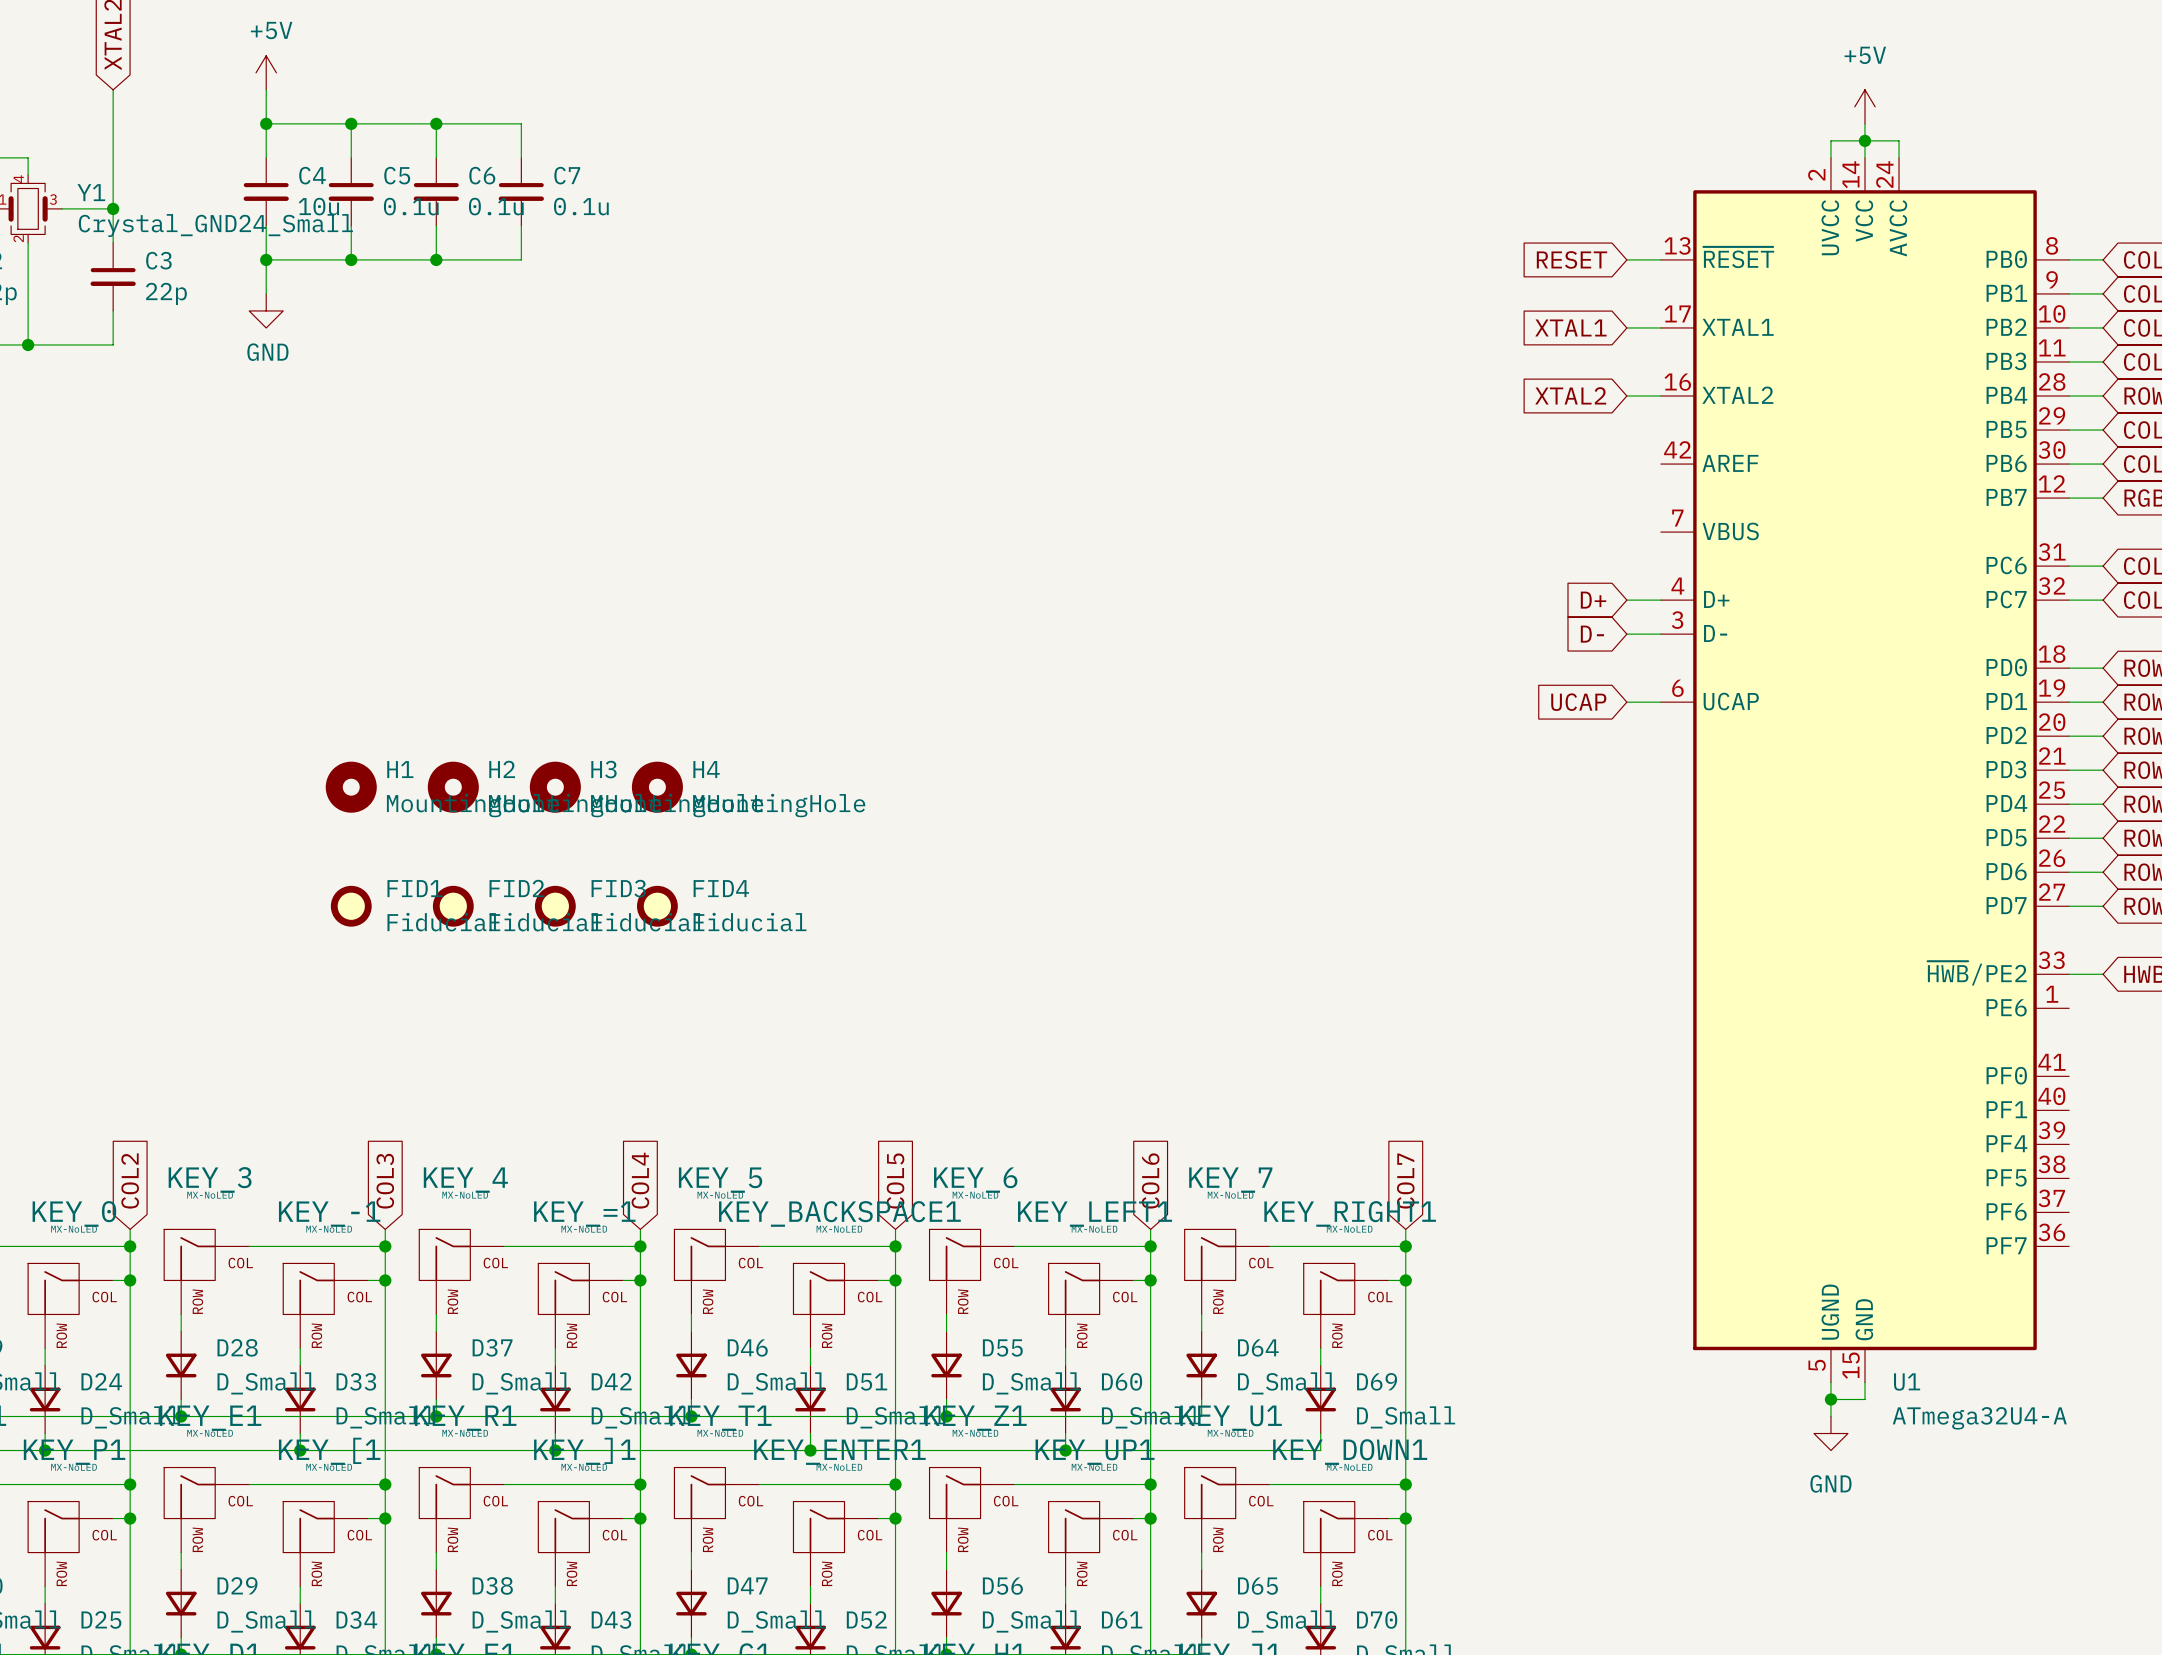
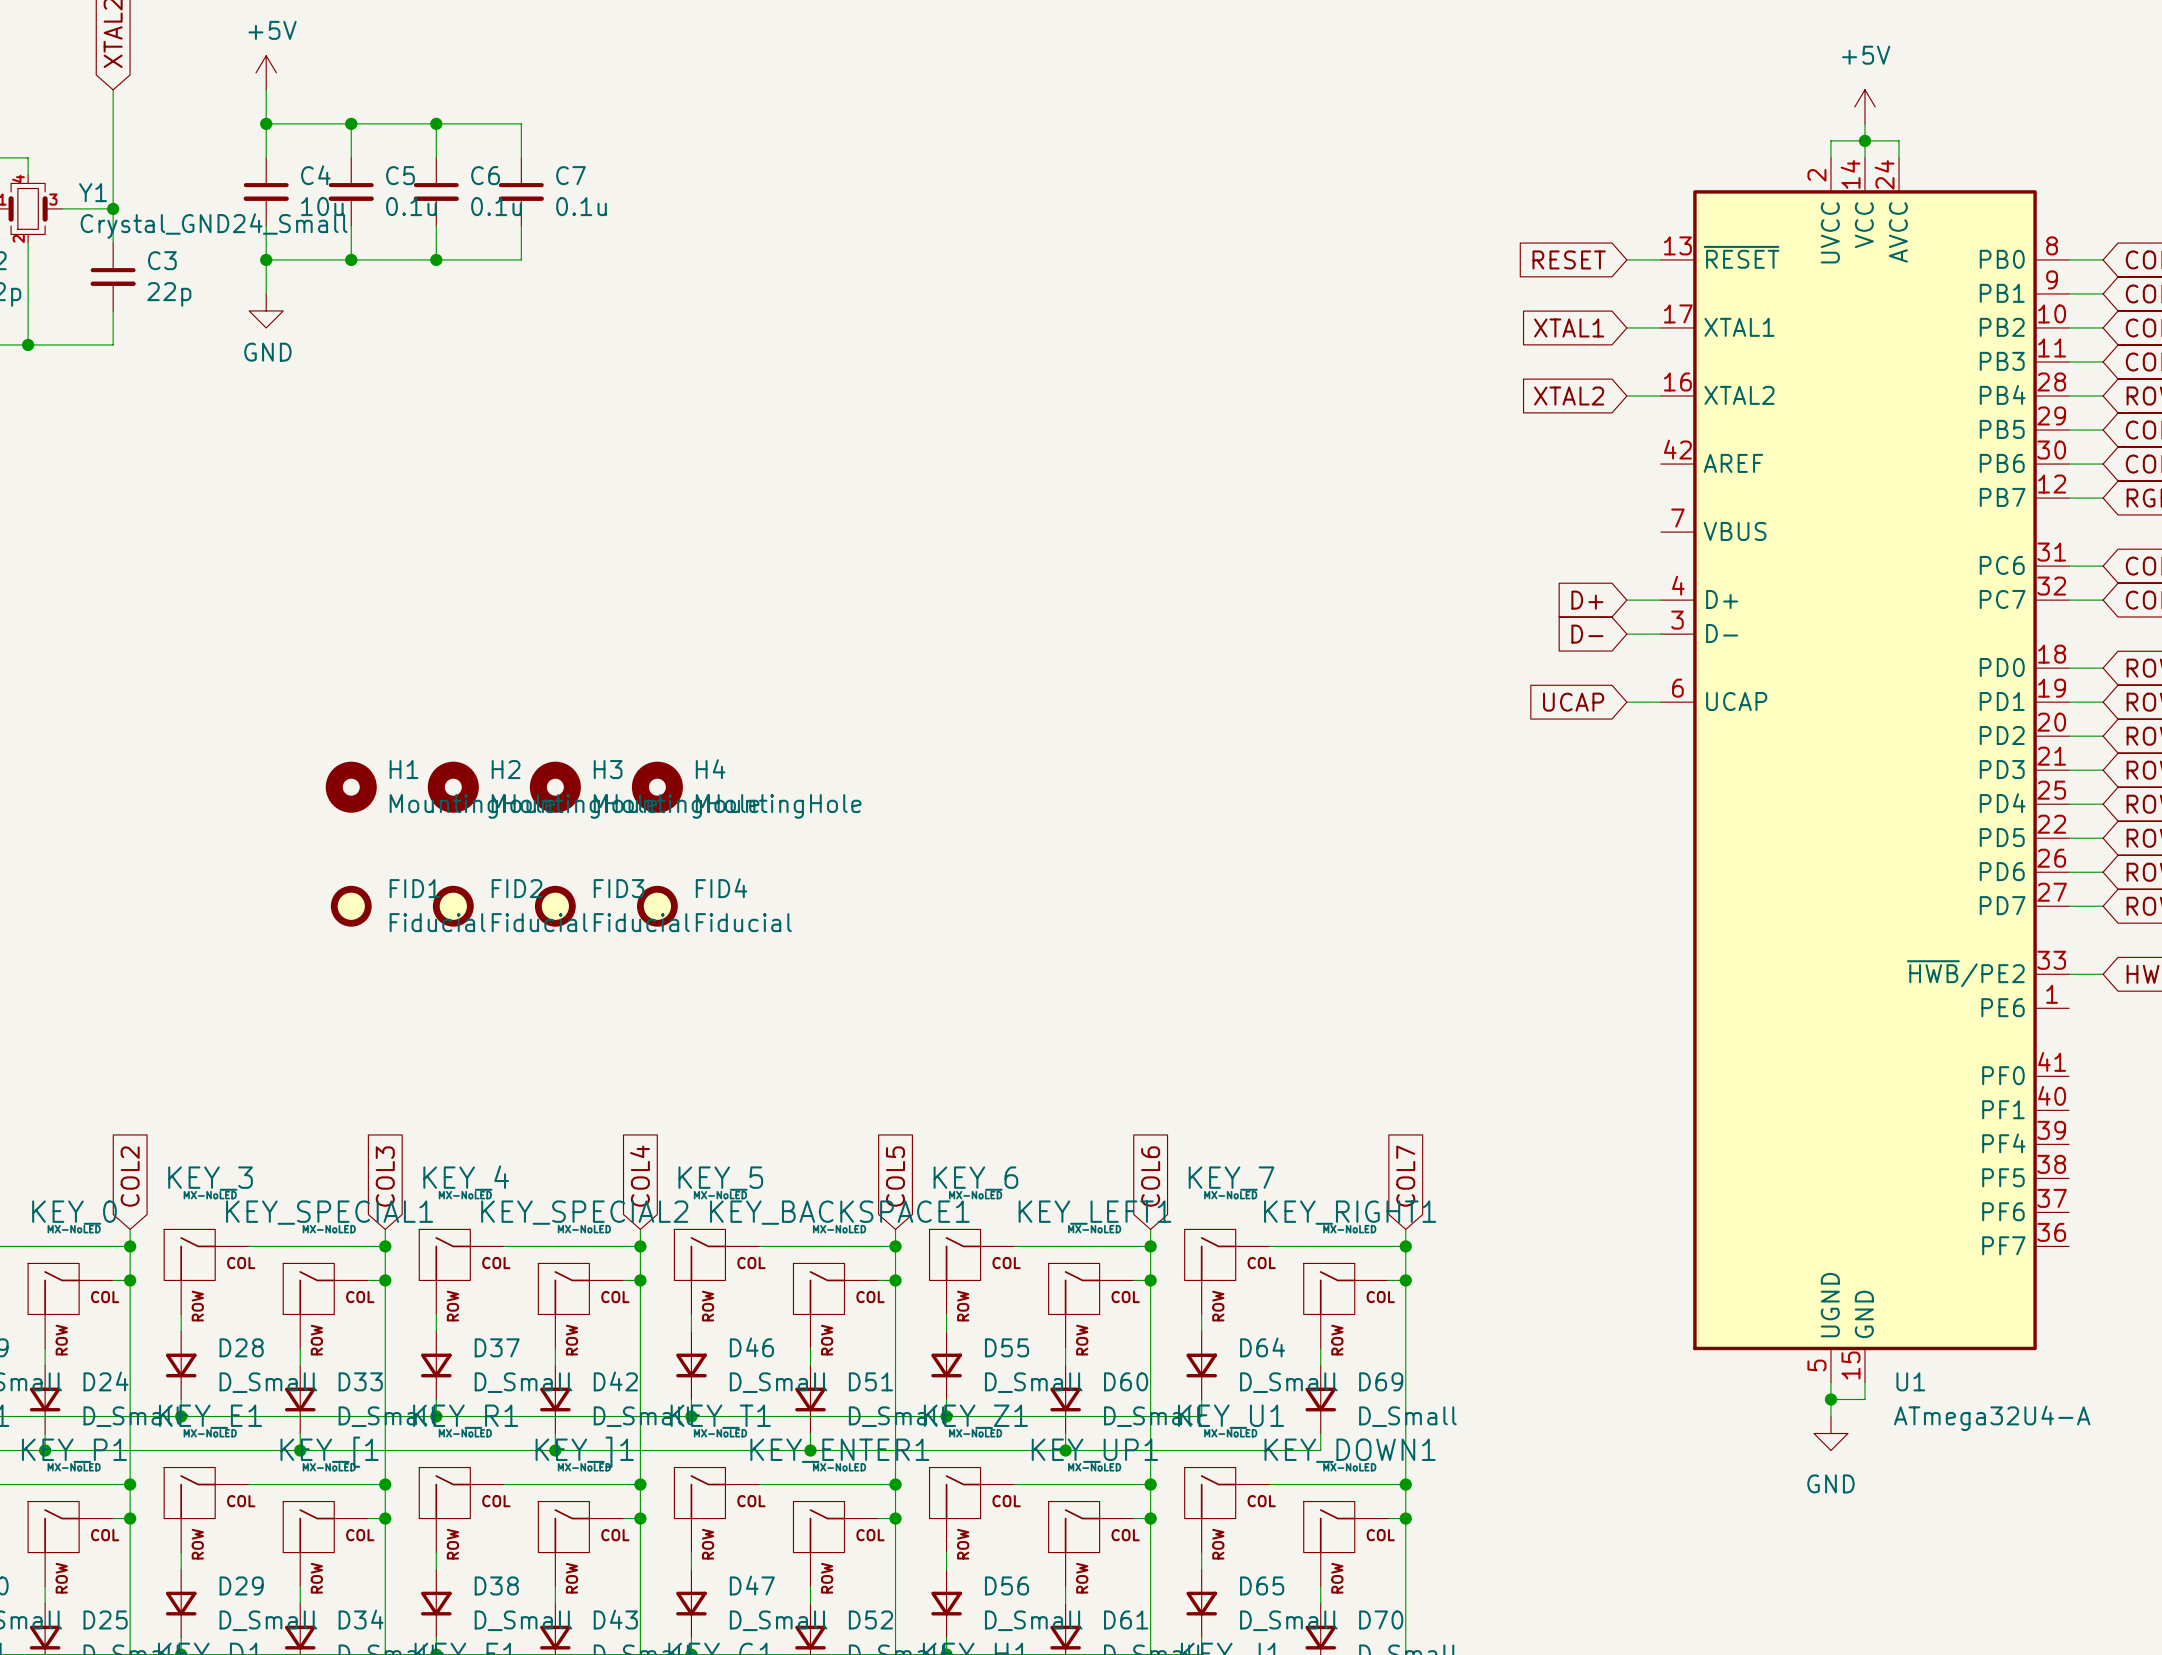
KEY_-1 name: KEY_-1 (329, 1214) -> KEY_SPECIAL1 (329, 1212)
KEY_=1 name: KEY_=1 (584, 1214) -> KEY_SPECIAL2 (584, 1212)

